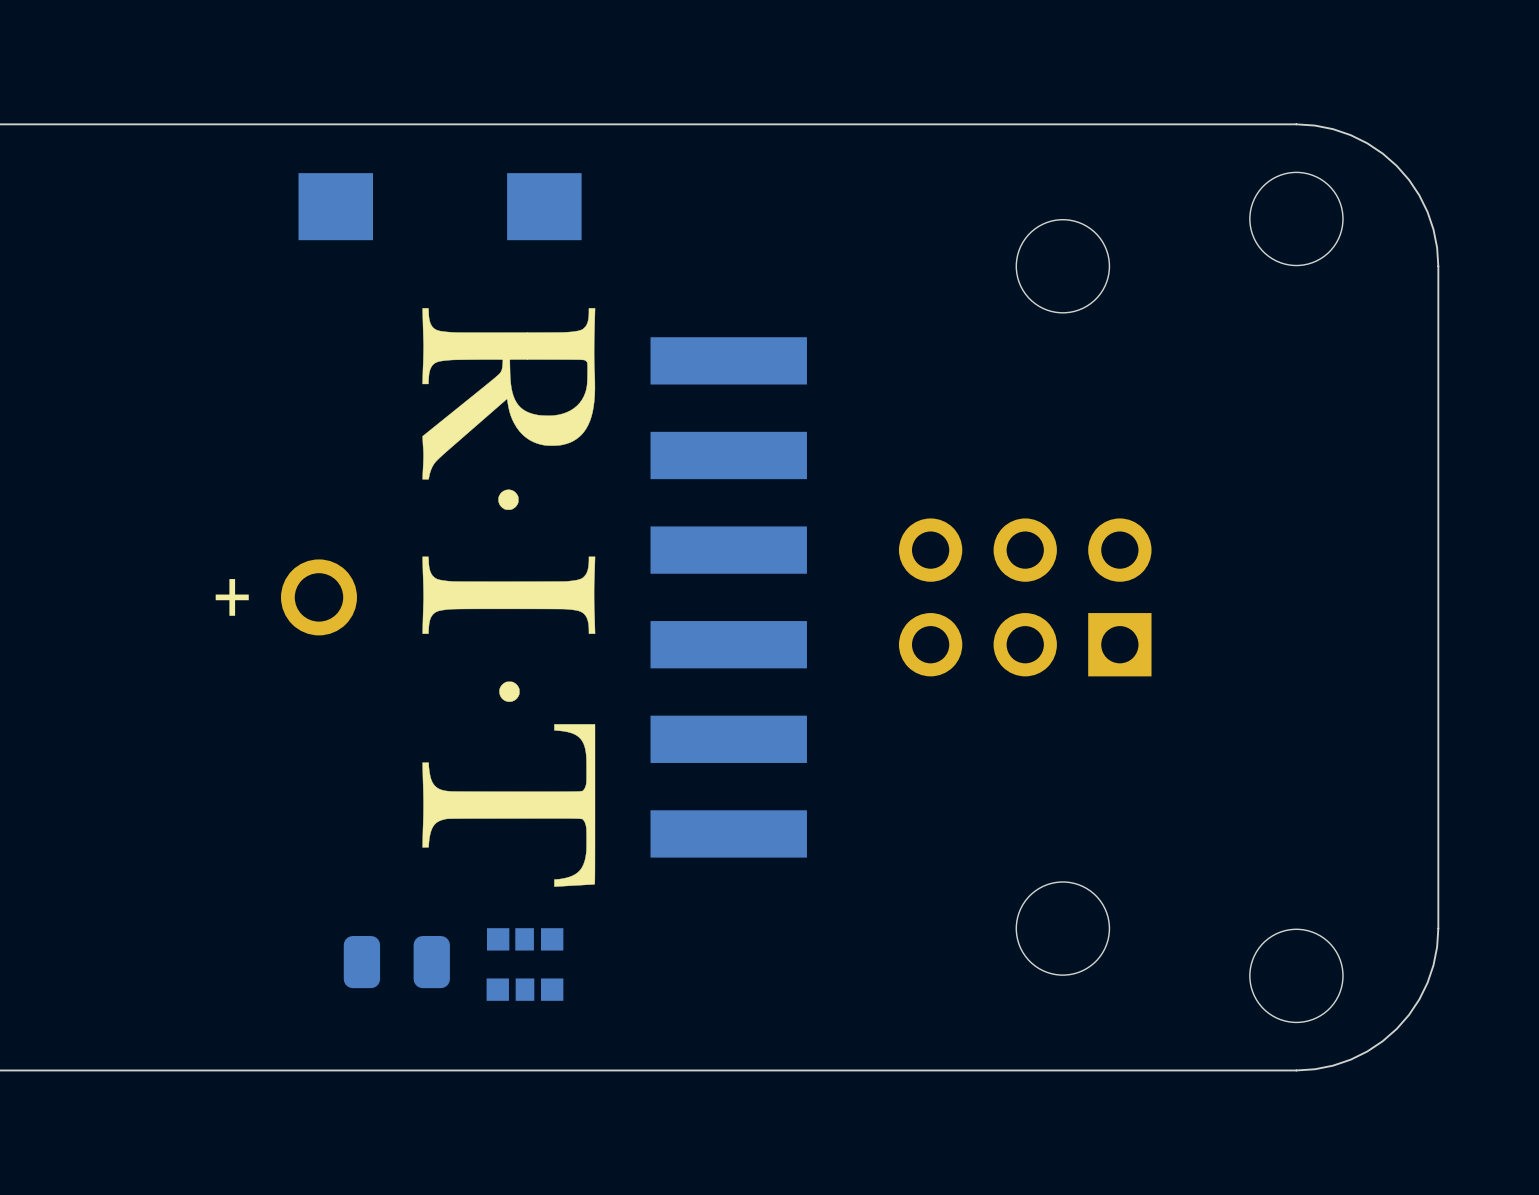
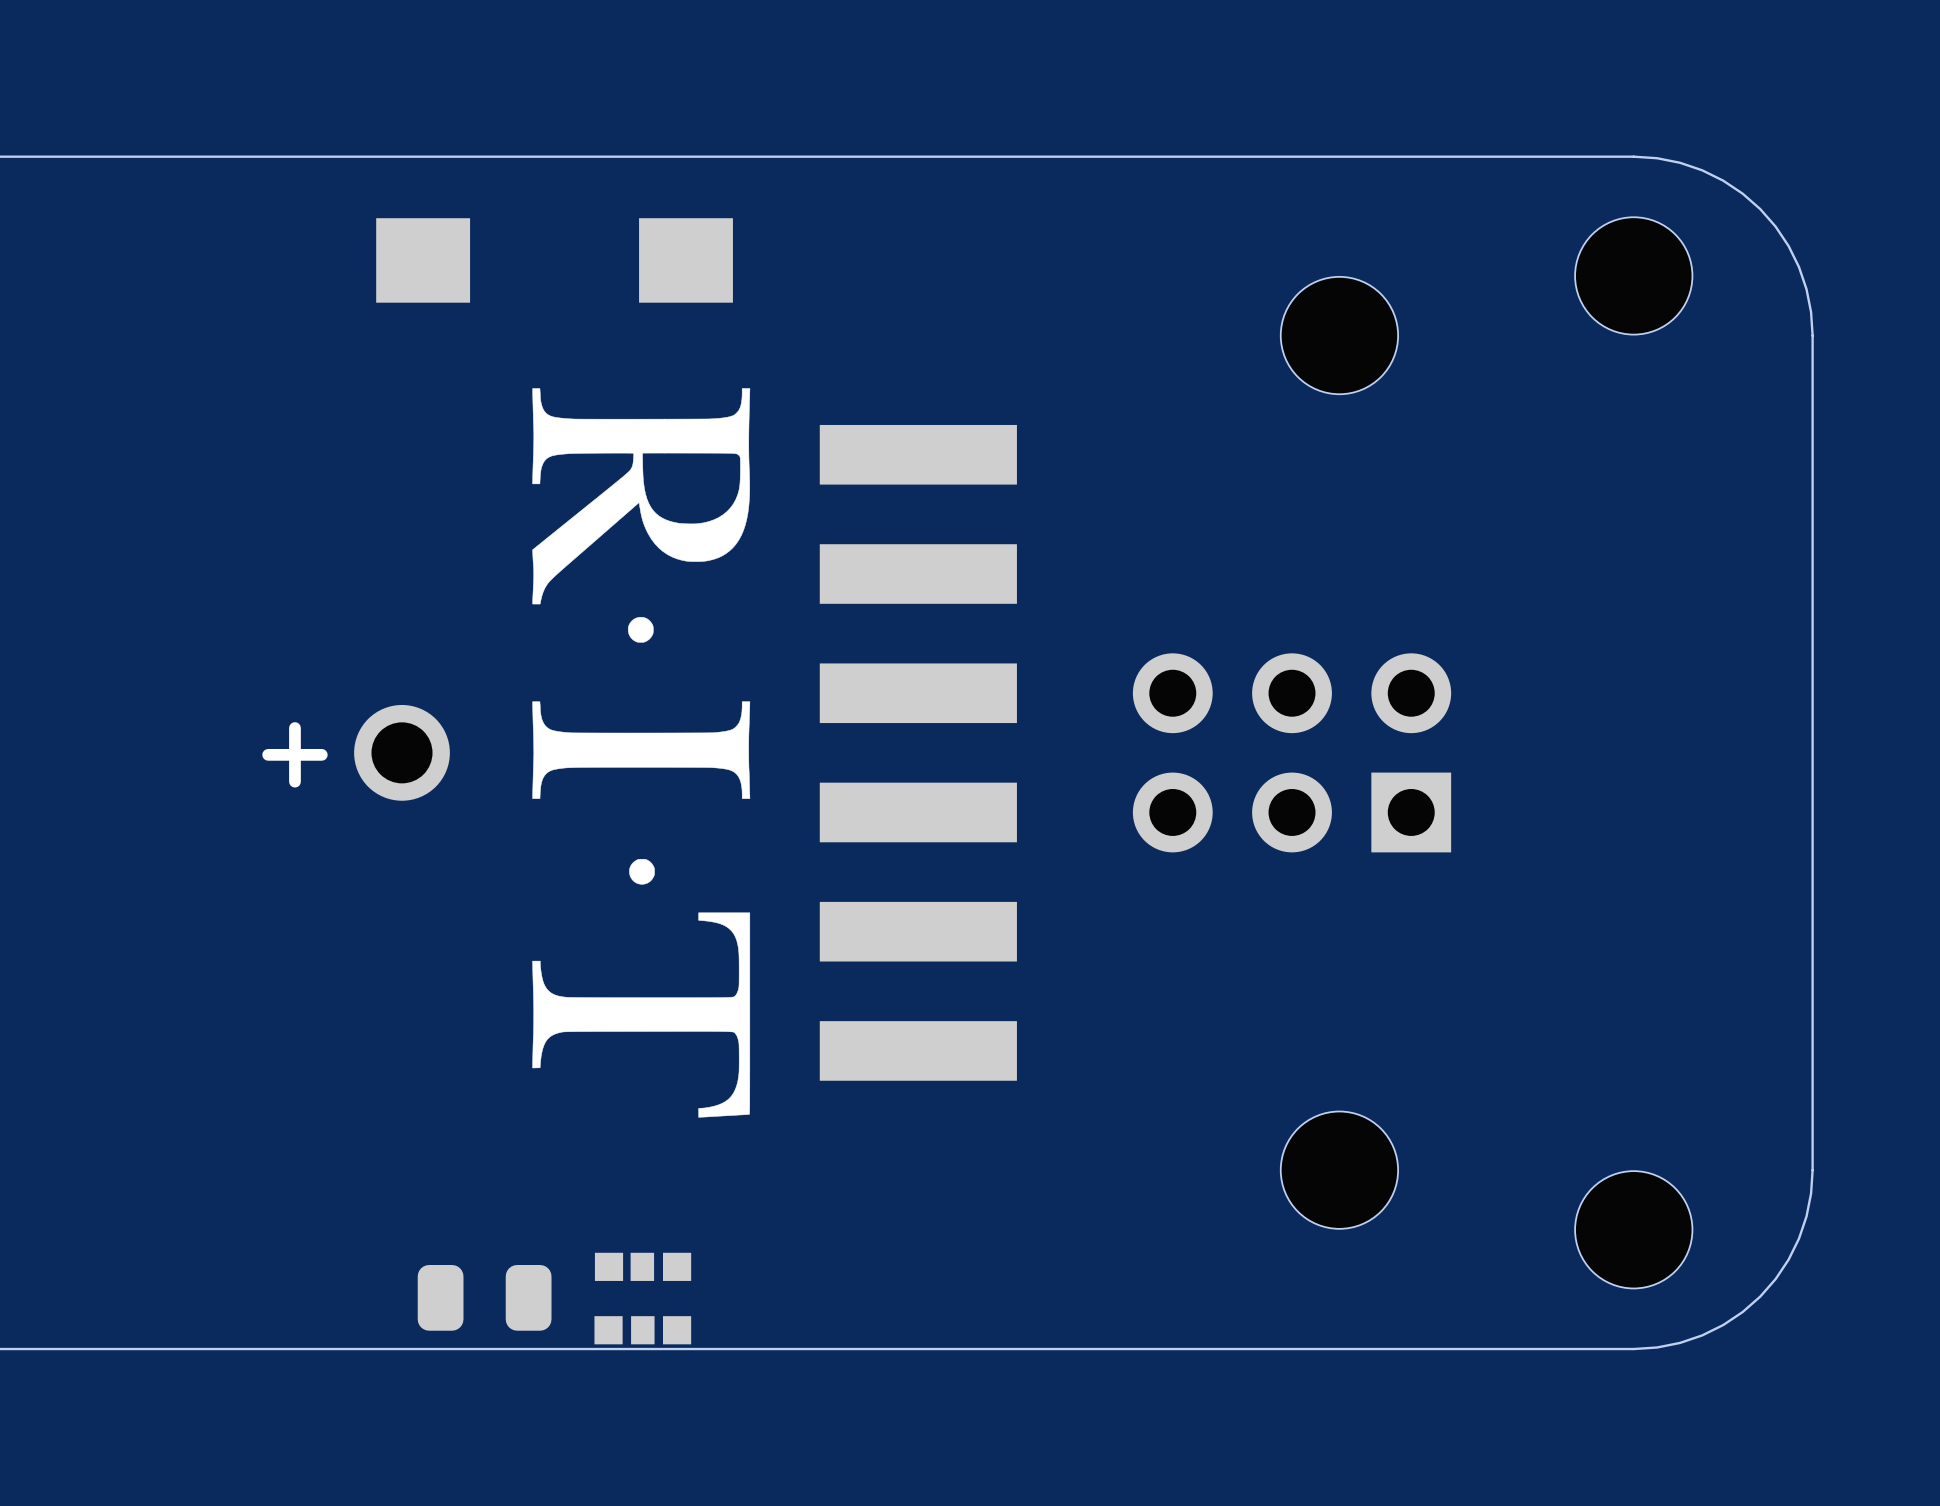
part position: (396, 962) -> (484, 1297)
part position: (524, 964) -> (642, 1298)

